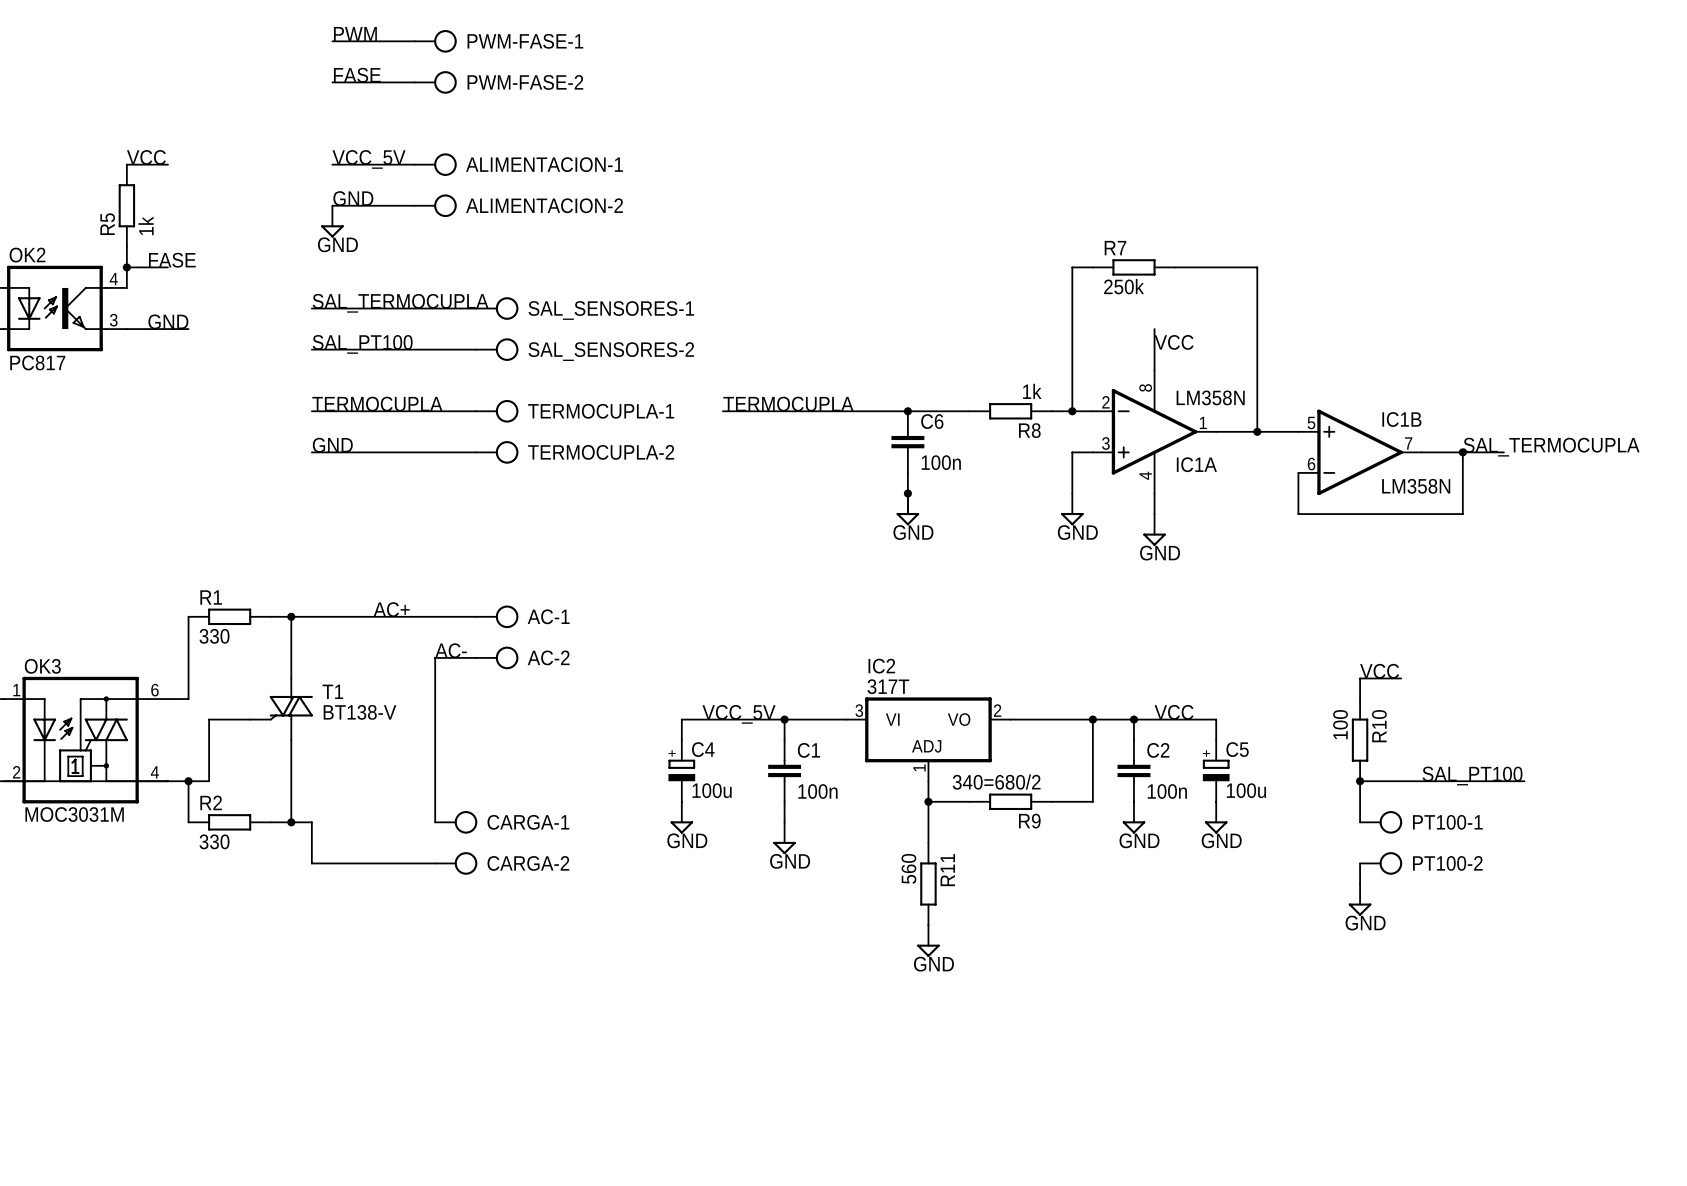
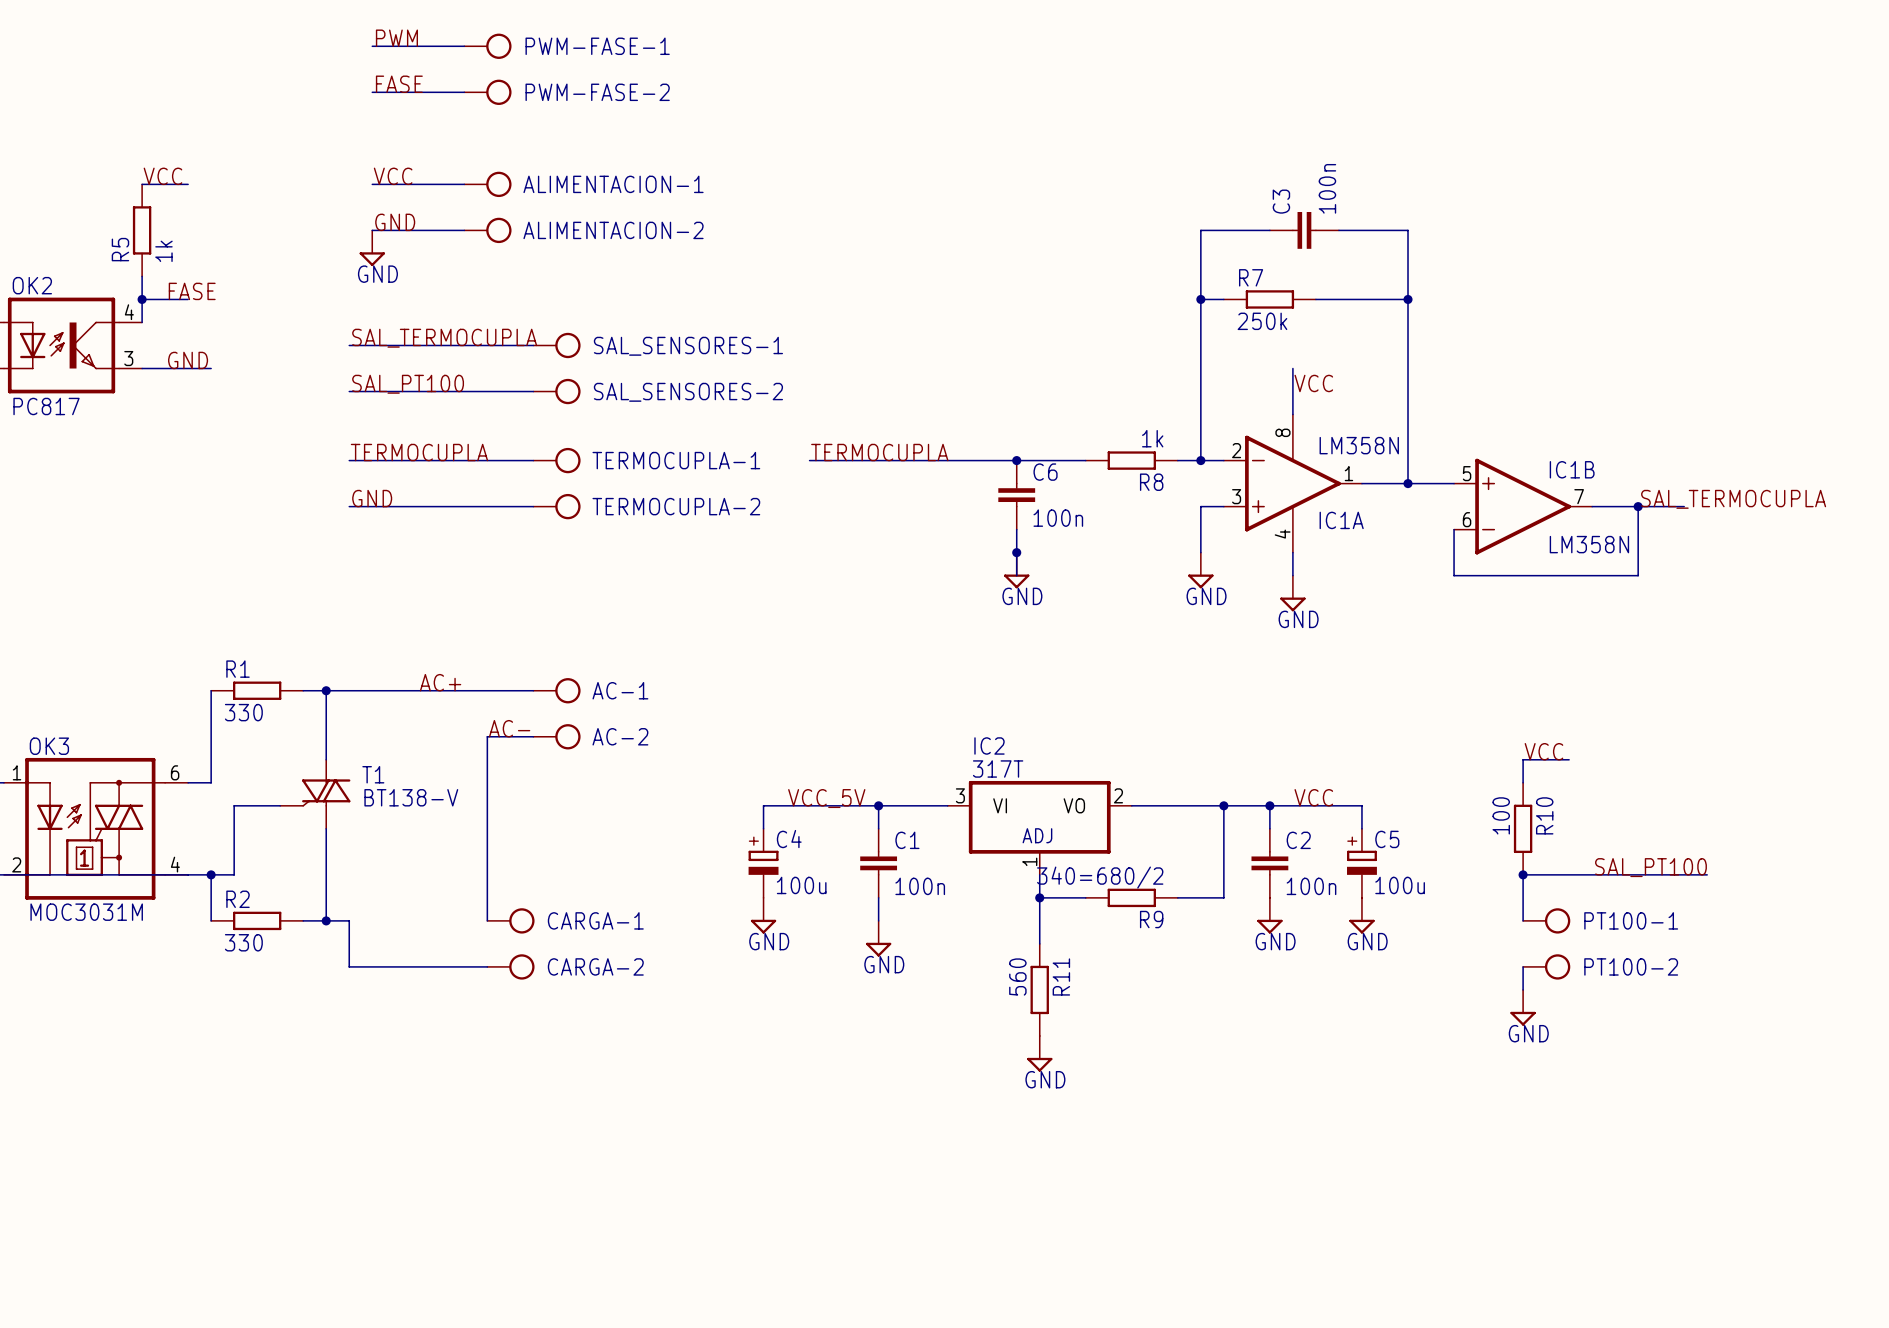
label: VCC_5V (369, 159) -> VCC (393, 176)
wire: none -> (1269, 230) (1200, 230) (1200, 299)
C3: none -> 100n (1304, 230)
wire: none -> (1338, 230) (1408, 230) (1408, 299)
junction: none -> (1200, 299)
junction: none -> (1408, 299)

